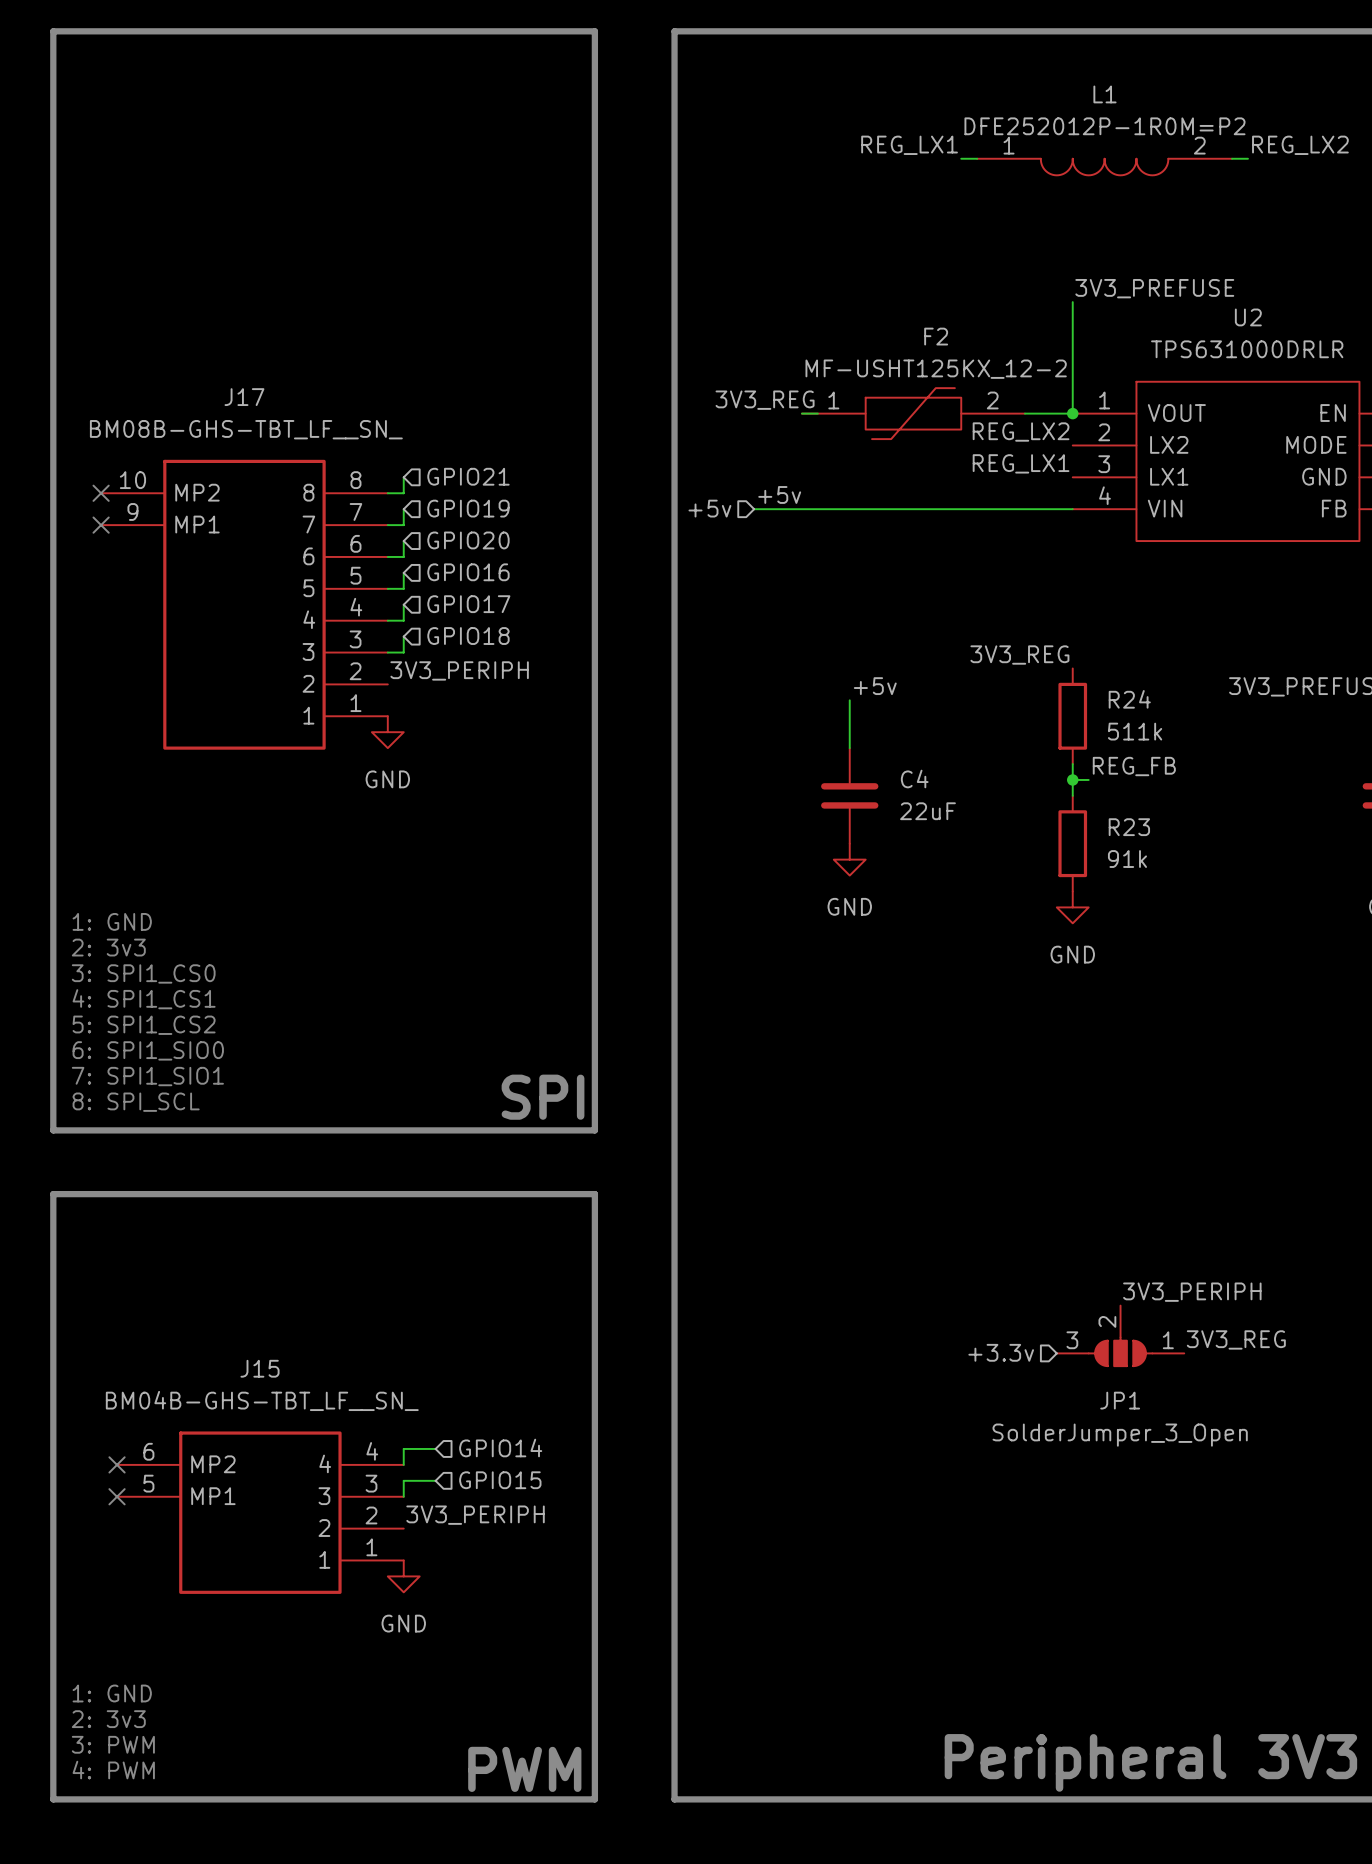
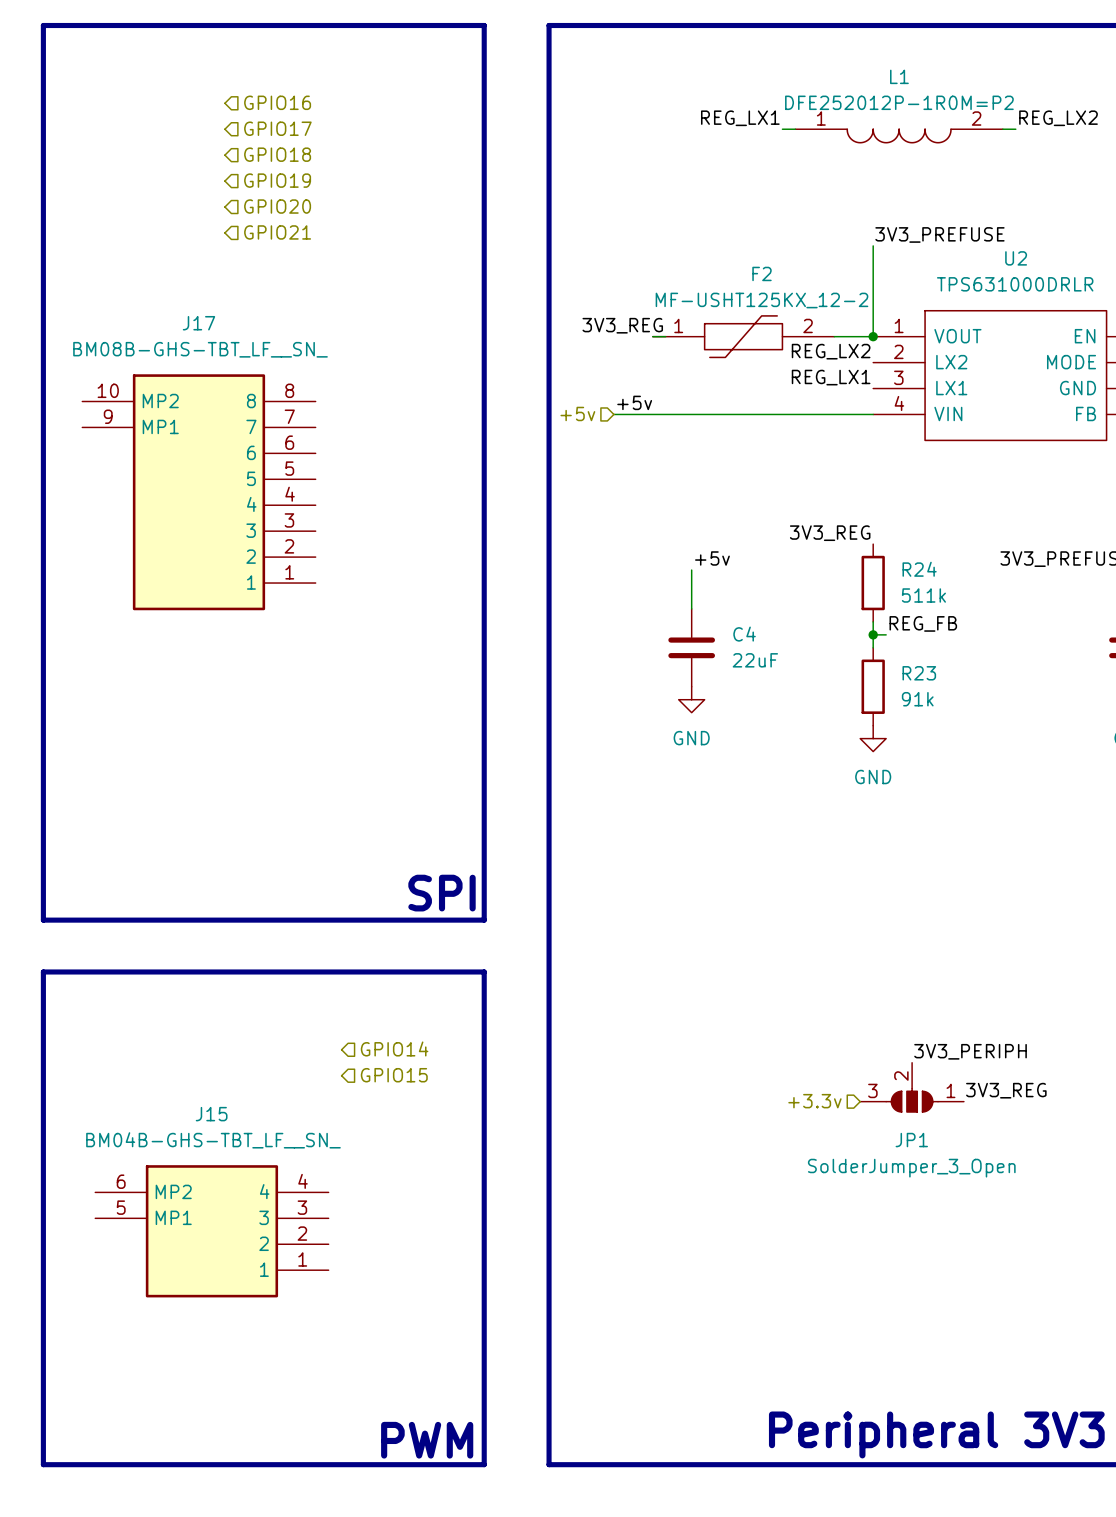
hierarchical label: none -> GPIO16 (277, 102)
hierarchical label: none -> GPIO17 (277, 128)
hierarchical label: none -> GPIO18 (277, 154)
hierarchical label: none -> GPIO19 (277, 180)
hierarchical label: none -> GPIO20 (277, 206)
hierarchical label position: GPIO21 (468, 476) -> GPIO21 (277, 232)
wire: (403, 477) (403, 493) (387, 493) -> none
no-connect mark: (101, 493) -> none
hierarchical label: GPIO19 (468, 508) -> none
wire: (403, 509) (403, 525) (387, 525) -> none
no-connect mark: (101, 525) -> none
hierarchical label: GPIO20 (468, 540) -> none
wire: (403, 541) (403, 556) (387, 556) -> none
wire: (403, 572) (403, 588) (387, 588) -> none
hierarchical label: GPIO16 (468, 572) -> none
wire: (403, 604) (403, 620) (387, 620) -> none
hierarchical label: GPIO17 (468, 604) -> none
wire: (403, 636) (403, 652) (387, 652) -> none
hierarchical label: GPIO18 (468, 636) -> none
label: 3V3_PERIPH (459, 670) -> none
power symbol: GND (387, 732) -> none
text: 1: GND (112, 921) -> none
text: 2: 3v3 (108, 947) -> none
text: 3: SPI1_CS0 (143, 973) -> none
text: 4: SPI1_CS1 (144, 999) -> none
text: 5: SPI1_CS2 (144, 1025) -> none
text: 6: SPI1_SIO0 (148, 1050) -> none
text: 7: SPI1_SIO1 (147, 1076) -> none
text: 8: SPI_SCL (136, 1102) -> none
wire: (435, 1448) (403, 1448) (403, 1464) -> none
hierarchical label position: GPIO14 (500, 1448) -> GPIO14 (394, 1048)
no-connect mark: (117, 1464) -> none
wire: (435, 1480) (403, 1480) (403, 1496) -> none
hierarchical label position: GPIO15 (500, 1480) -> GPIO15 (394, 1075)
no-connect mark: (117, 1496) -> none
label: 3V3_PERIPH (475, 1515) -> none
power symbol: GND (403, 1576) -> none
text: 1: GND (112, 1693) -> none
text: 2: 3v3 (108, 1719) -> none
text: 3: PWM (113, 1744) -> none
text: 4: PWM (113, 1770) -> none

